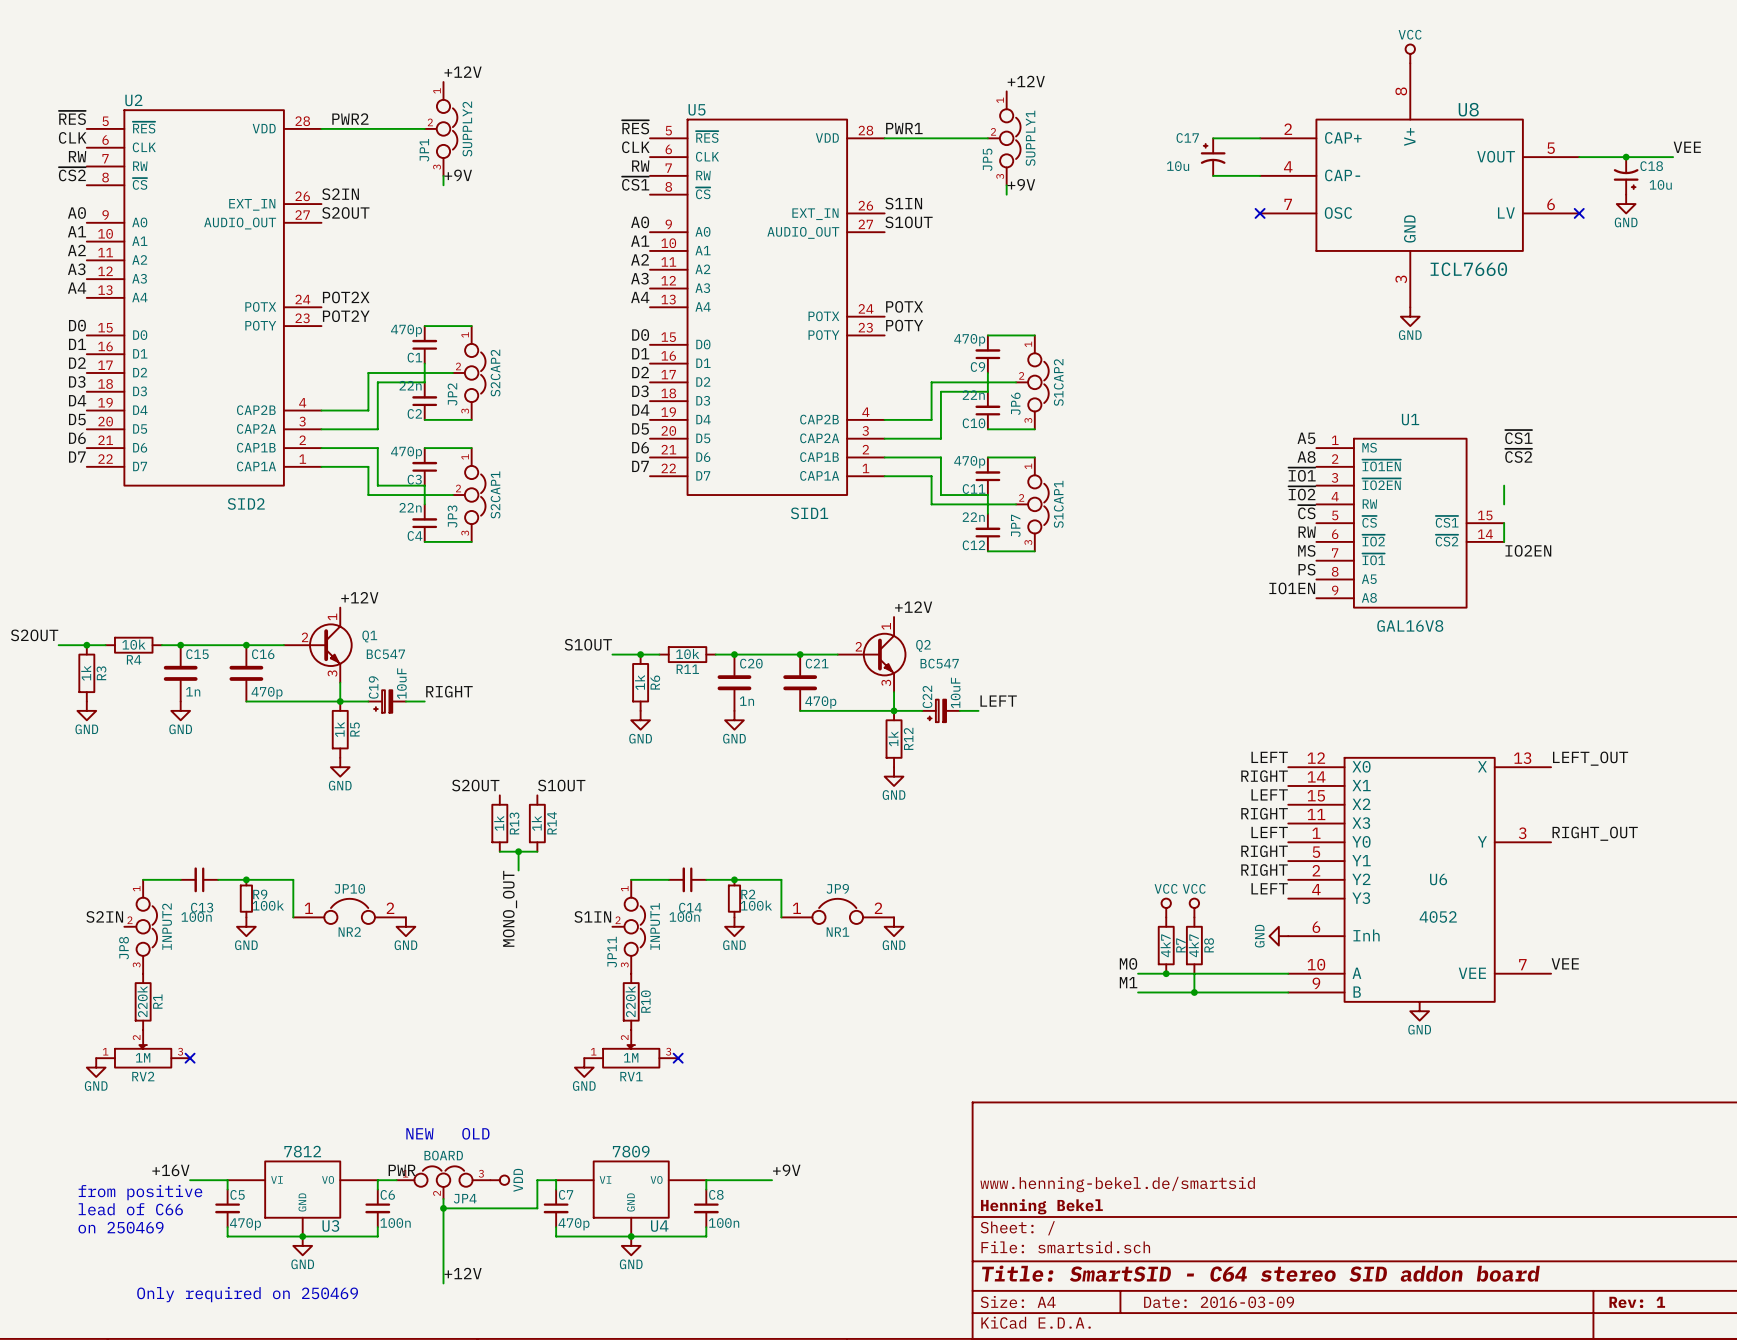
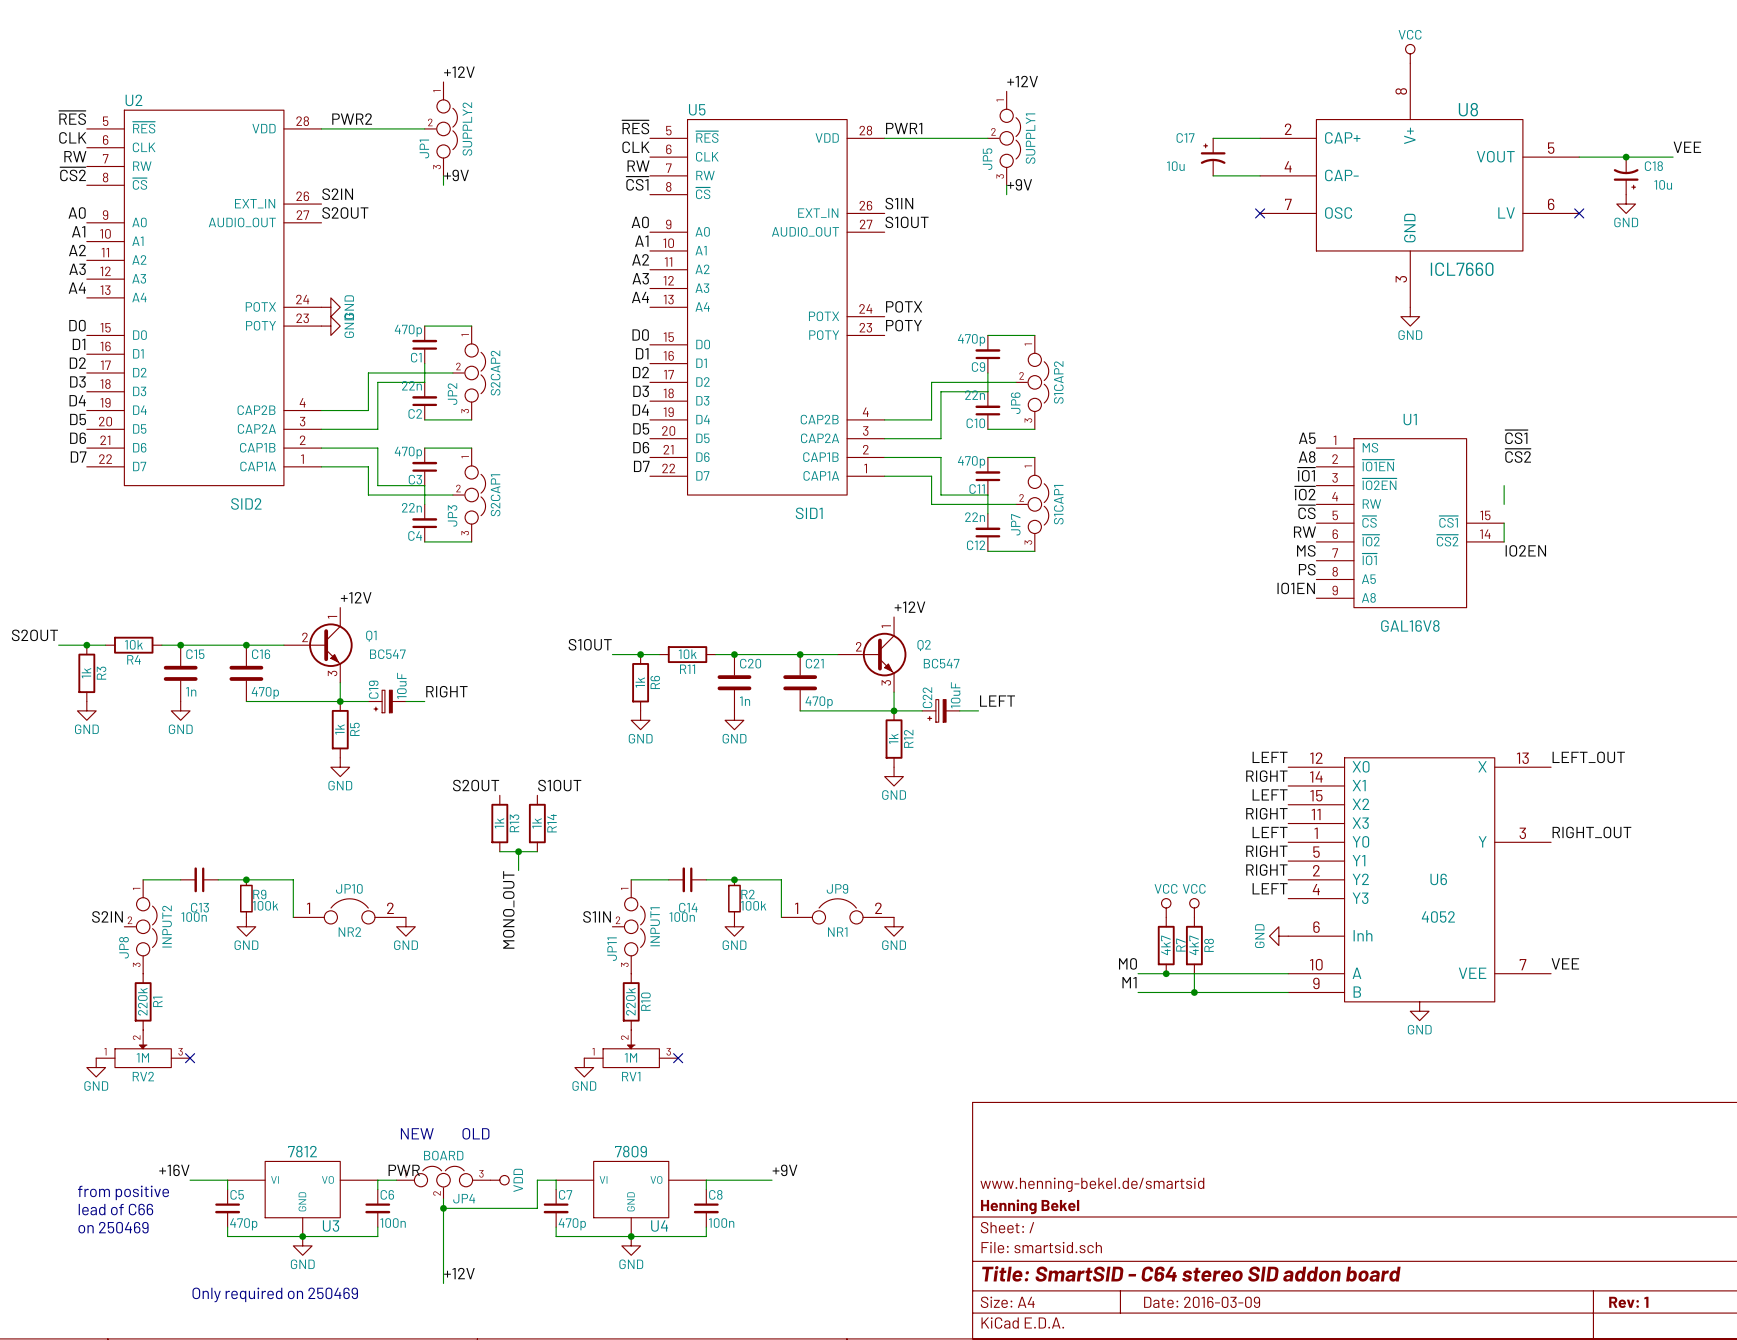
label: POT2X (346, 297) -> none
power symbol: none -> GND (330, 307)
label: POT2Y (346, 316) -> none
power symbol: none -> GND (330, 326)

